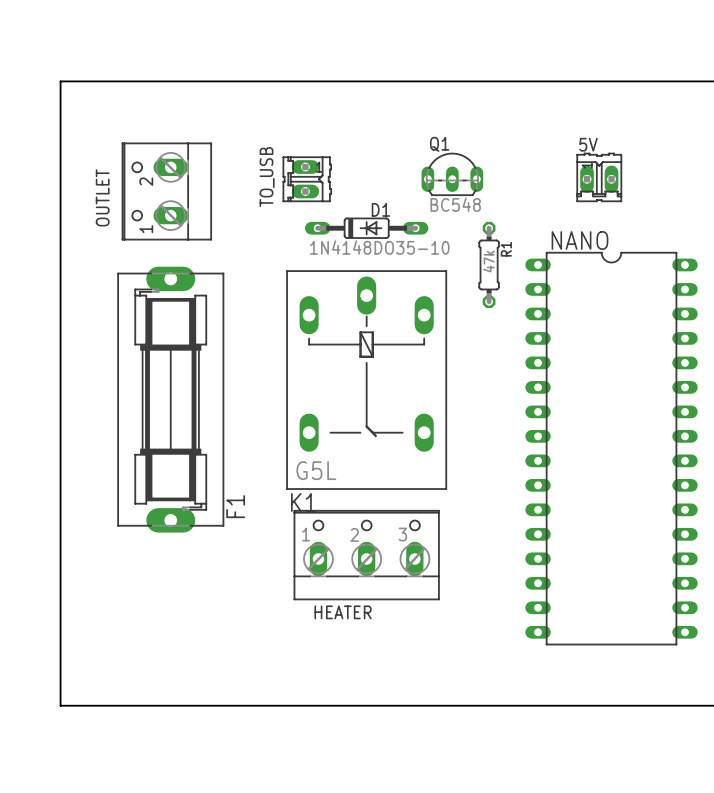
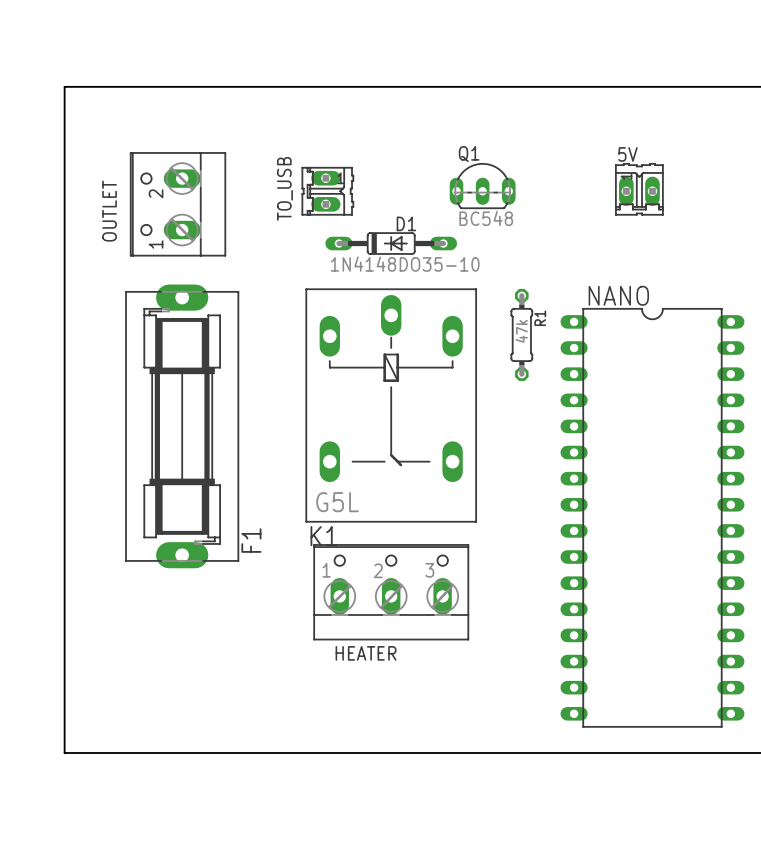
R1 position: (489, 264) -> (521, 334)
NANO position: (611, 448) -> (652, 517)

